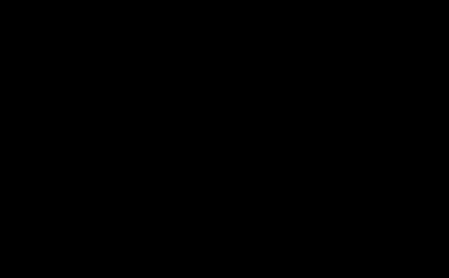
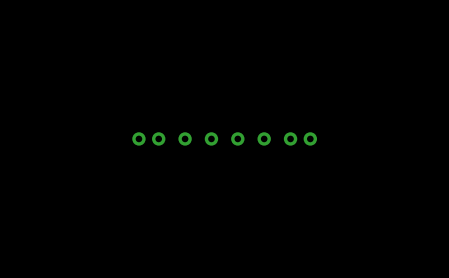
part: none -> (224, 138)

